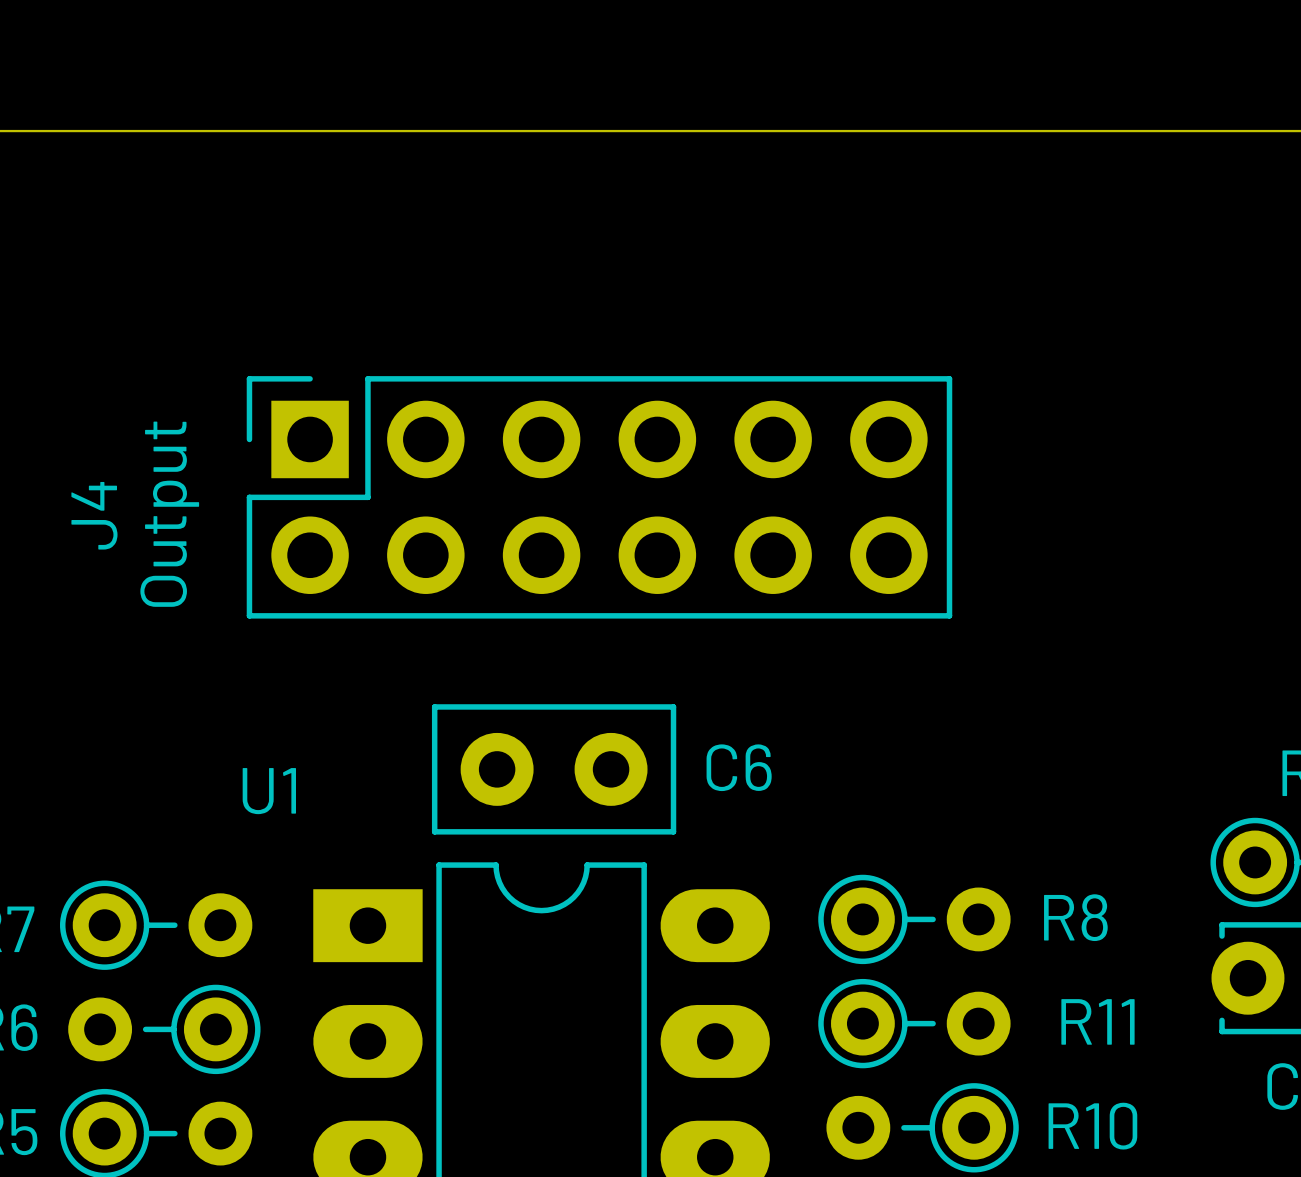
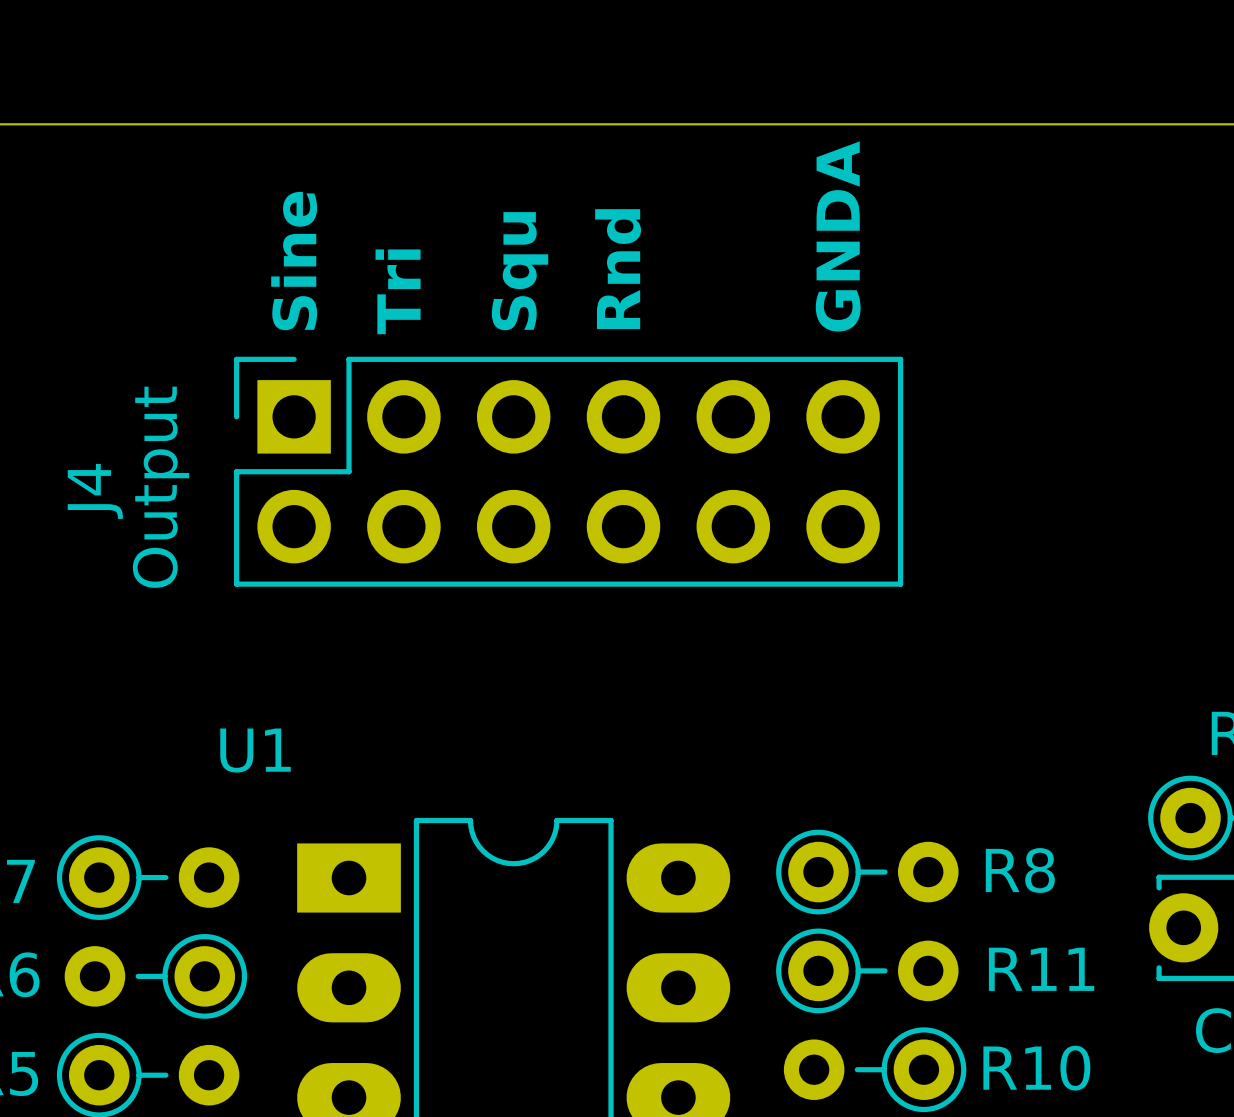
text: none -> GNDA (838, 236)
text: none -> Sine (294, 261)
text: none -> Rnd (618, 269)
text: none -> Squ (520, 271)
text: none -> Tri (398, 291)
C6: (554, 769) -> none

